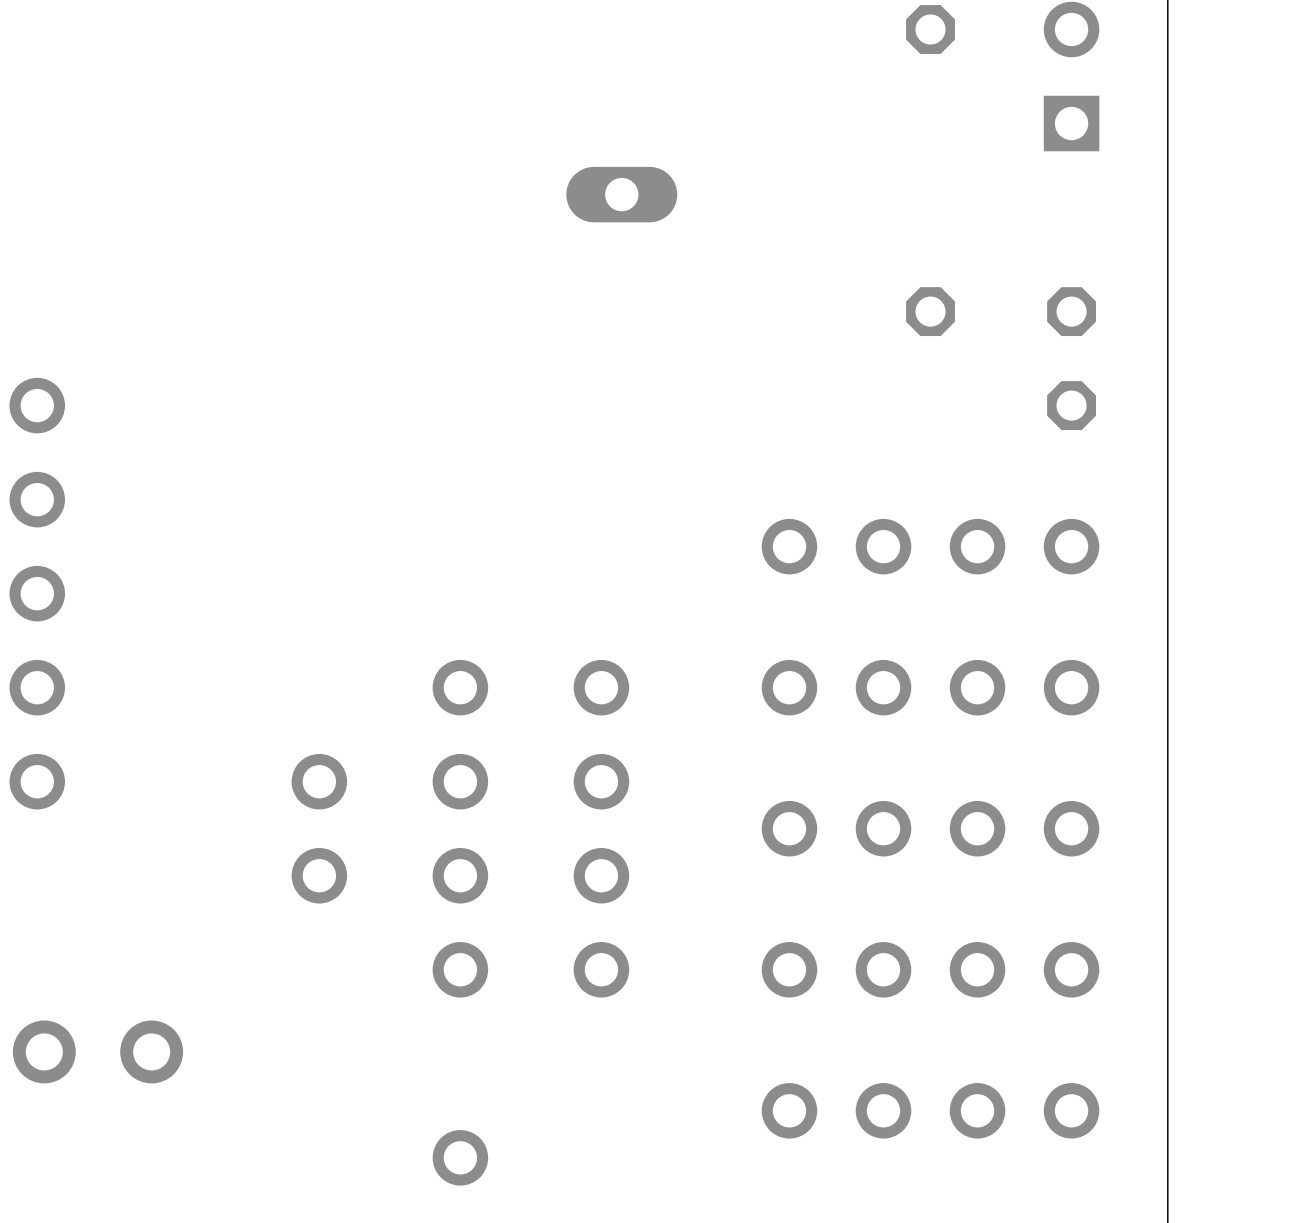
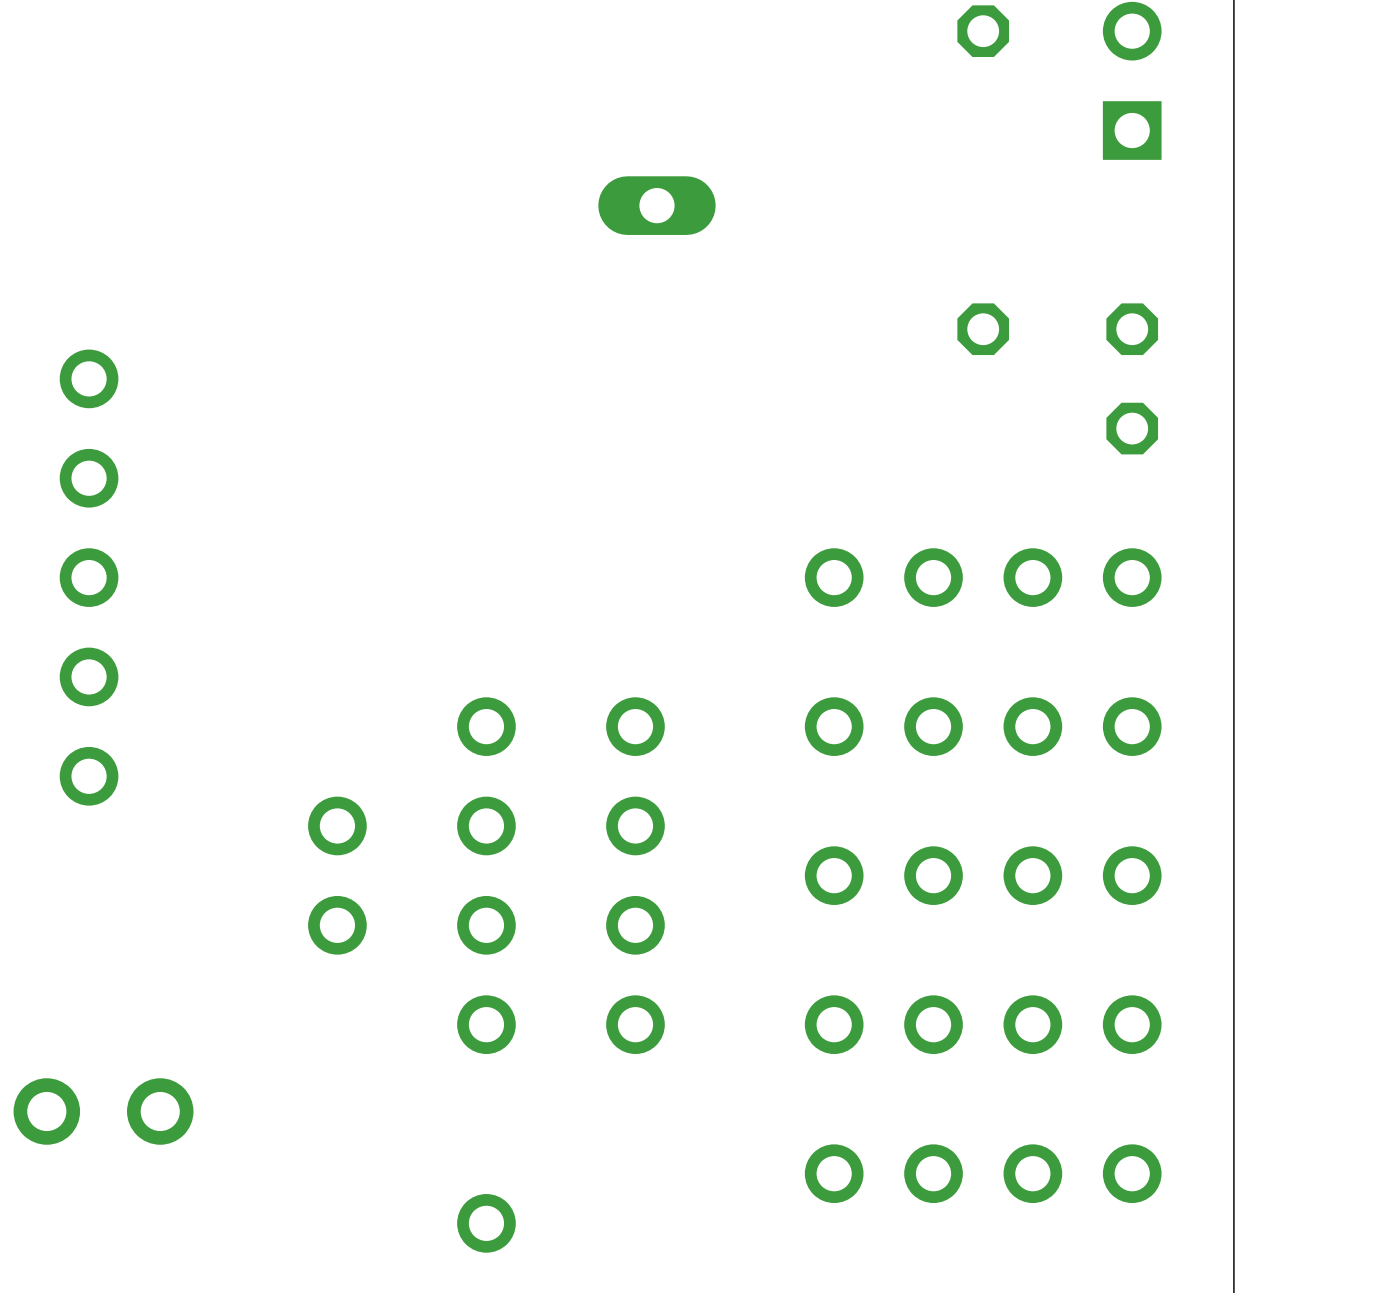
part position: (37, 405) -> (89, 378)
part position: (37, 546) -> (89, 527)
part position: (37, 734) -> (89, 726)

